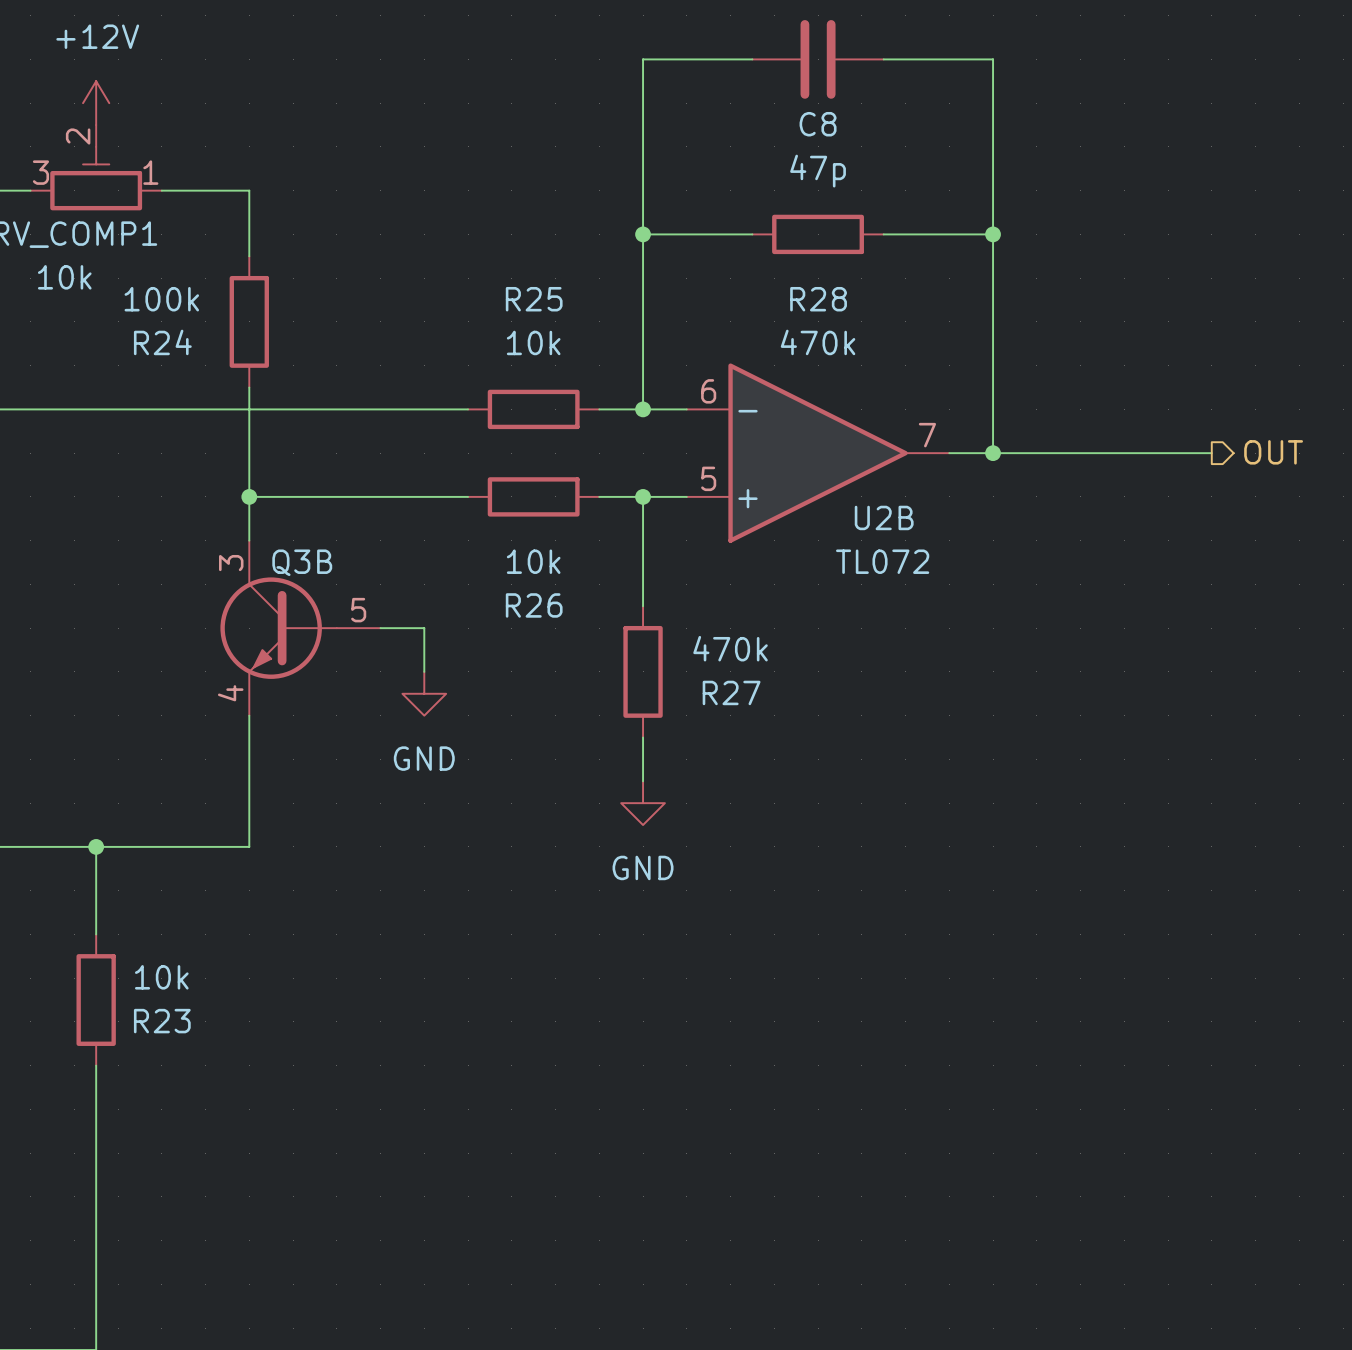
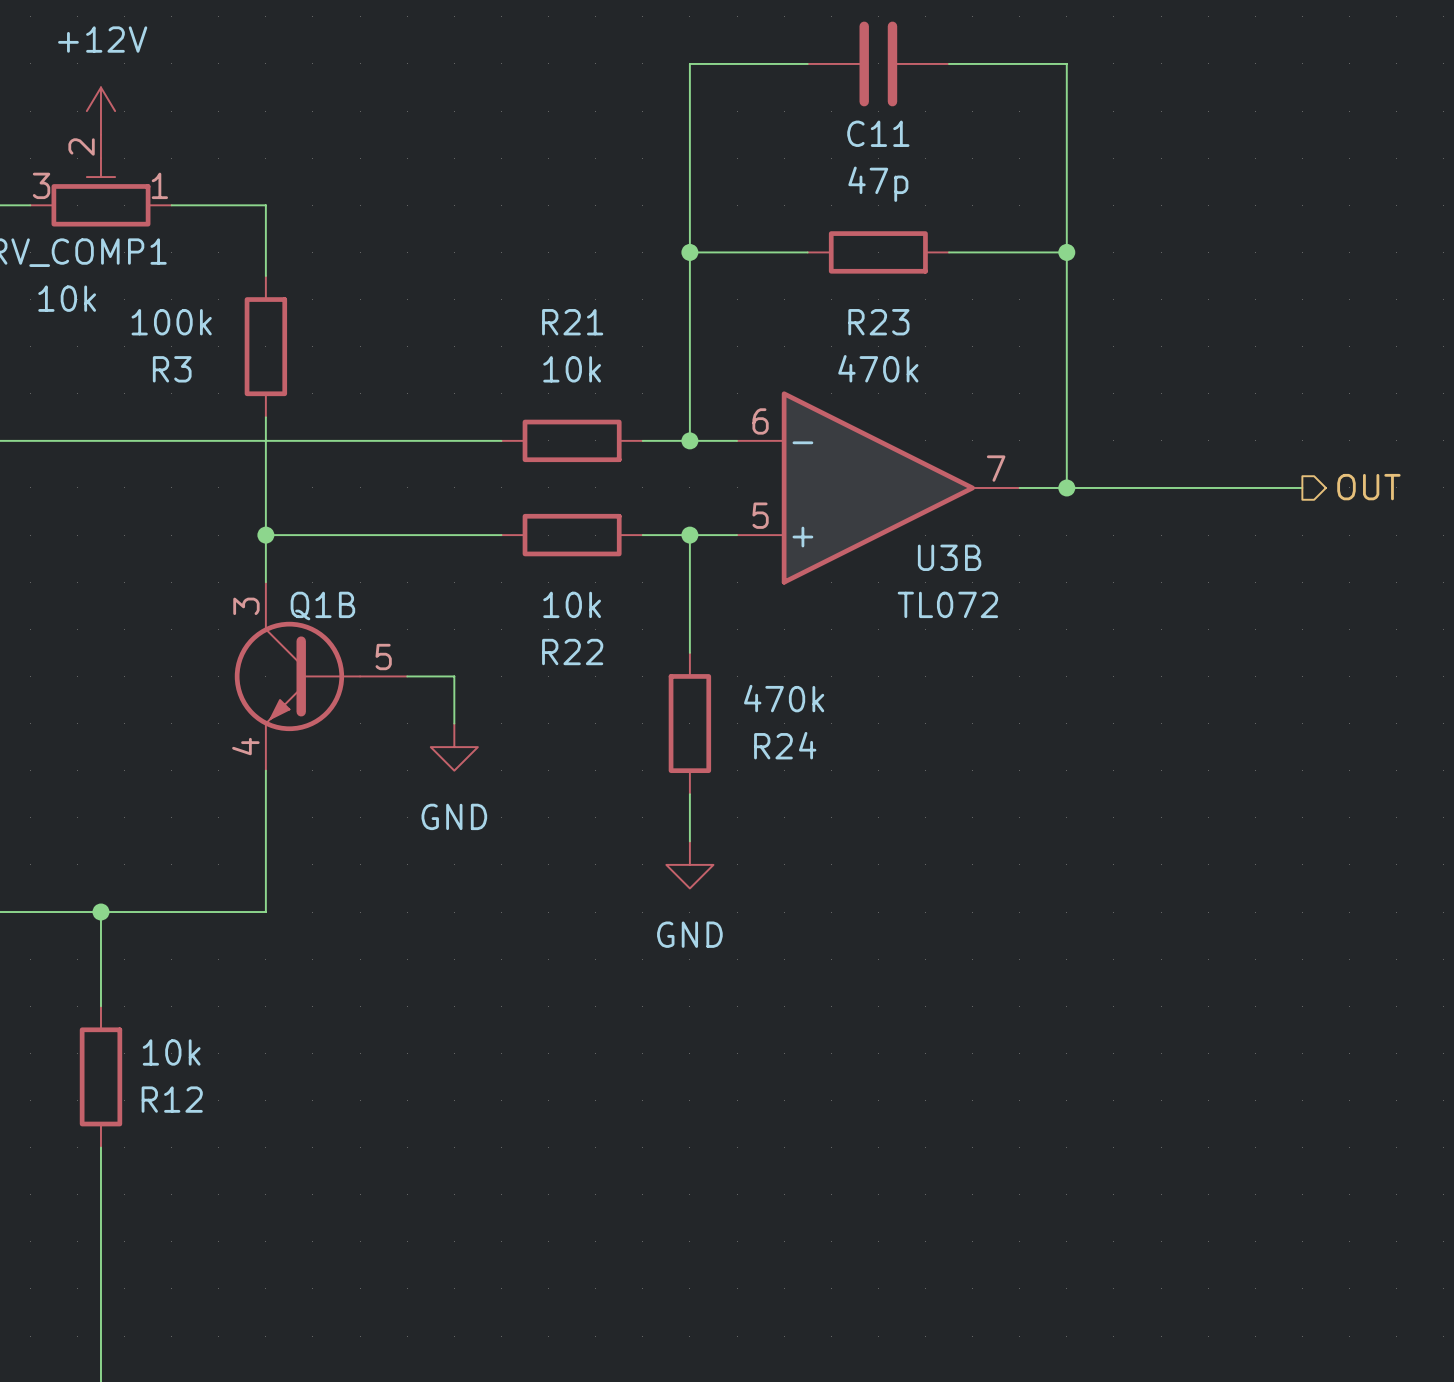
C8 name: C8 (818, 124) -> C11 (878, 133)
R25 name: R25 (534, 299) -> R21 (572, 322)
R28 name: R28 (818, 299) -> R23 (878, 322)
R24 name: R24 (162, 342) -> R3 (172, 369)
U2B name: U2B (884, 517) -> U3B (949, 557)
Q3B name: Q3B (302, 562) -> Q1B (322, 606)
R26 name: R26 (534, 605) -> R22 (572, 652)
R27 name: R27 (731, 692) -> R24 (785, 745)
R23 name: R23 (162, 1021) -> R12 (172, 1099)

